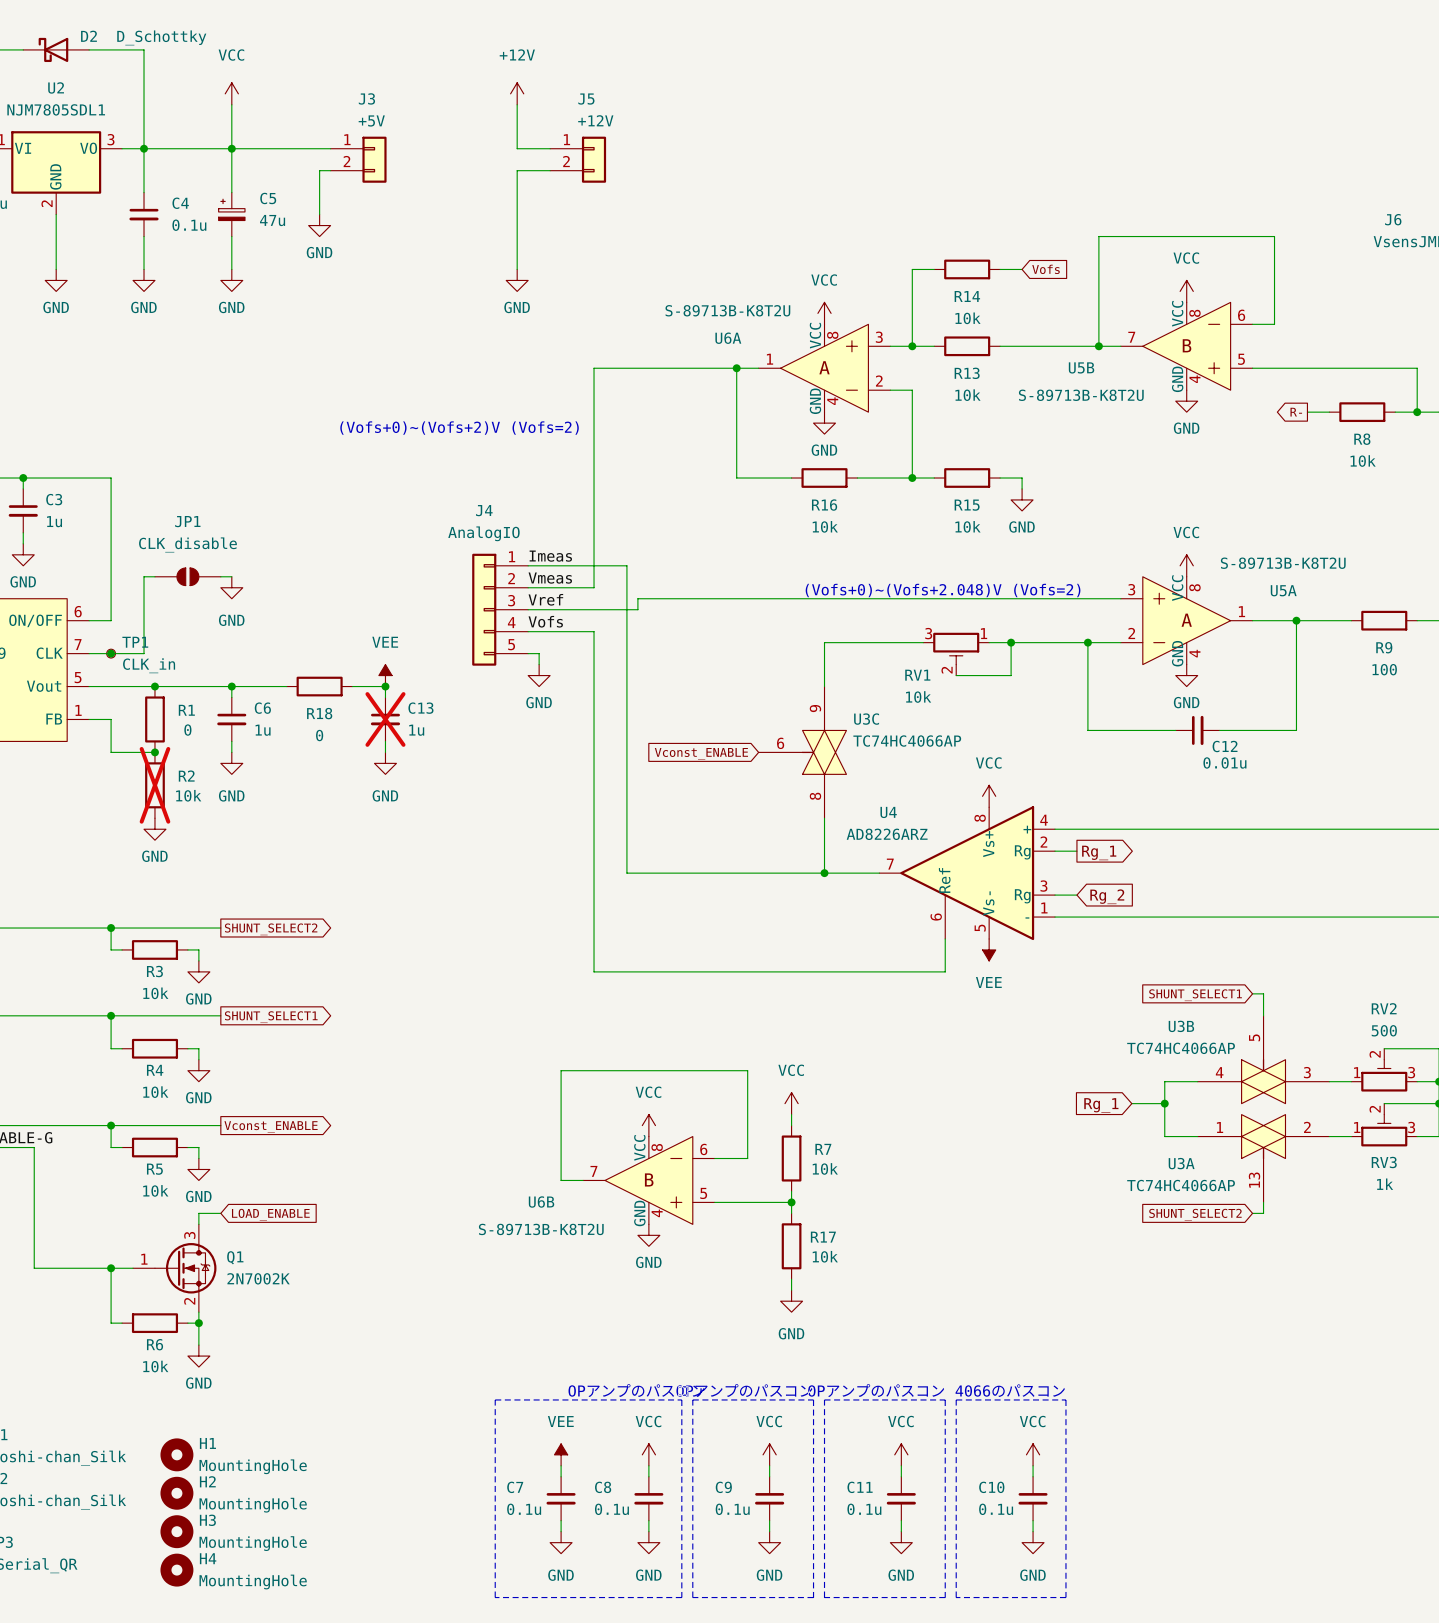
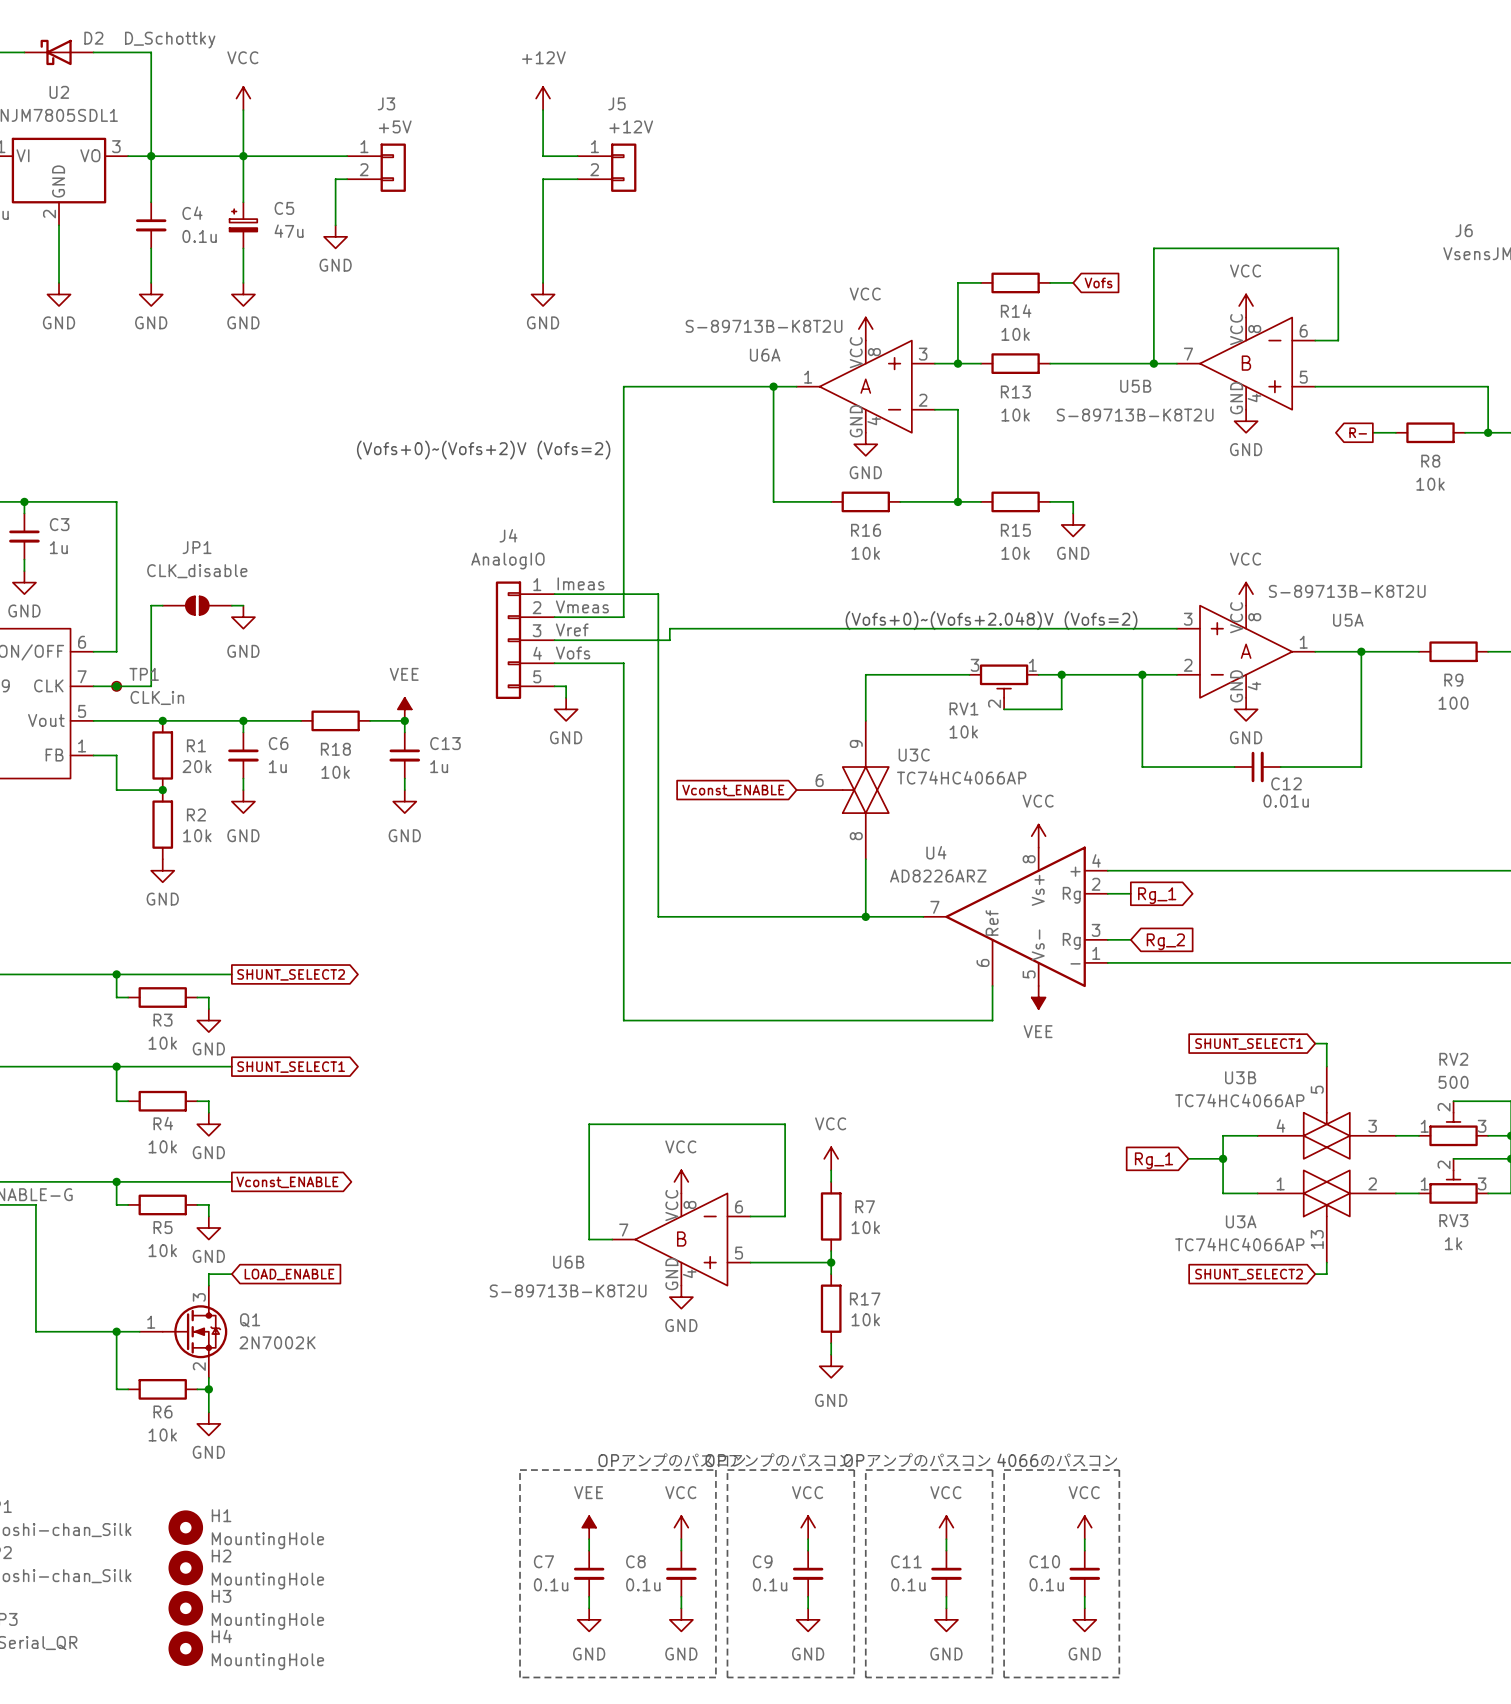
C13 do-not-place cross: (385, 719) -> none
R1 value: 0 (187, 730) -> 20k (197, 766)
R18 value: 0 (319, 735) -> 10k (335, 772)
R2 do-not-place cross: (154, 785) -> none

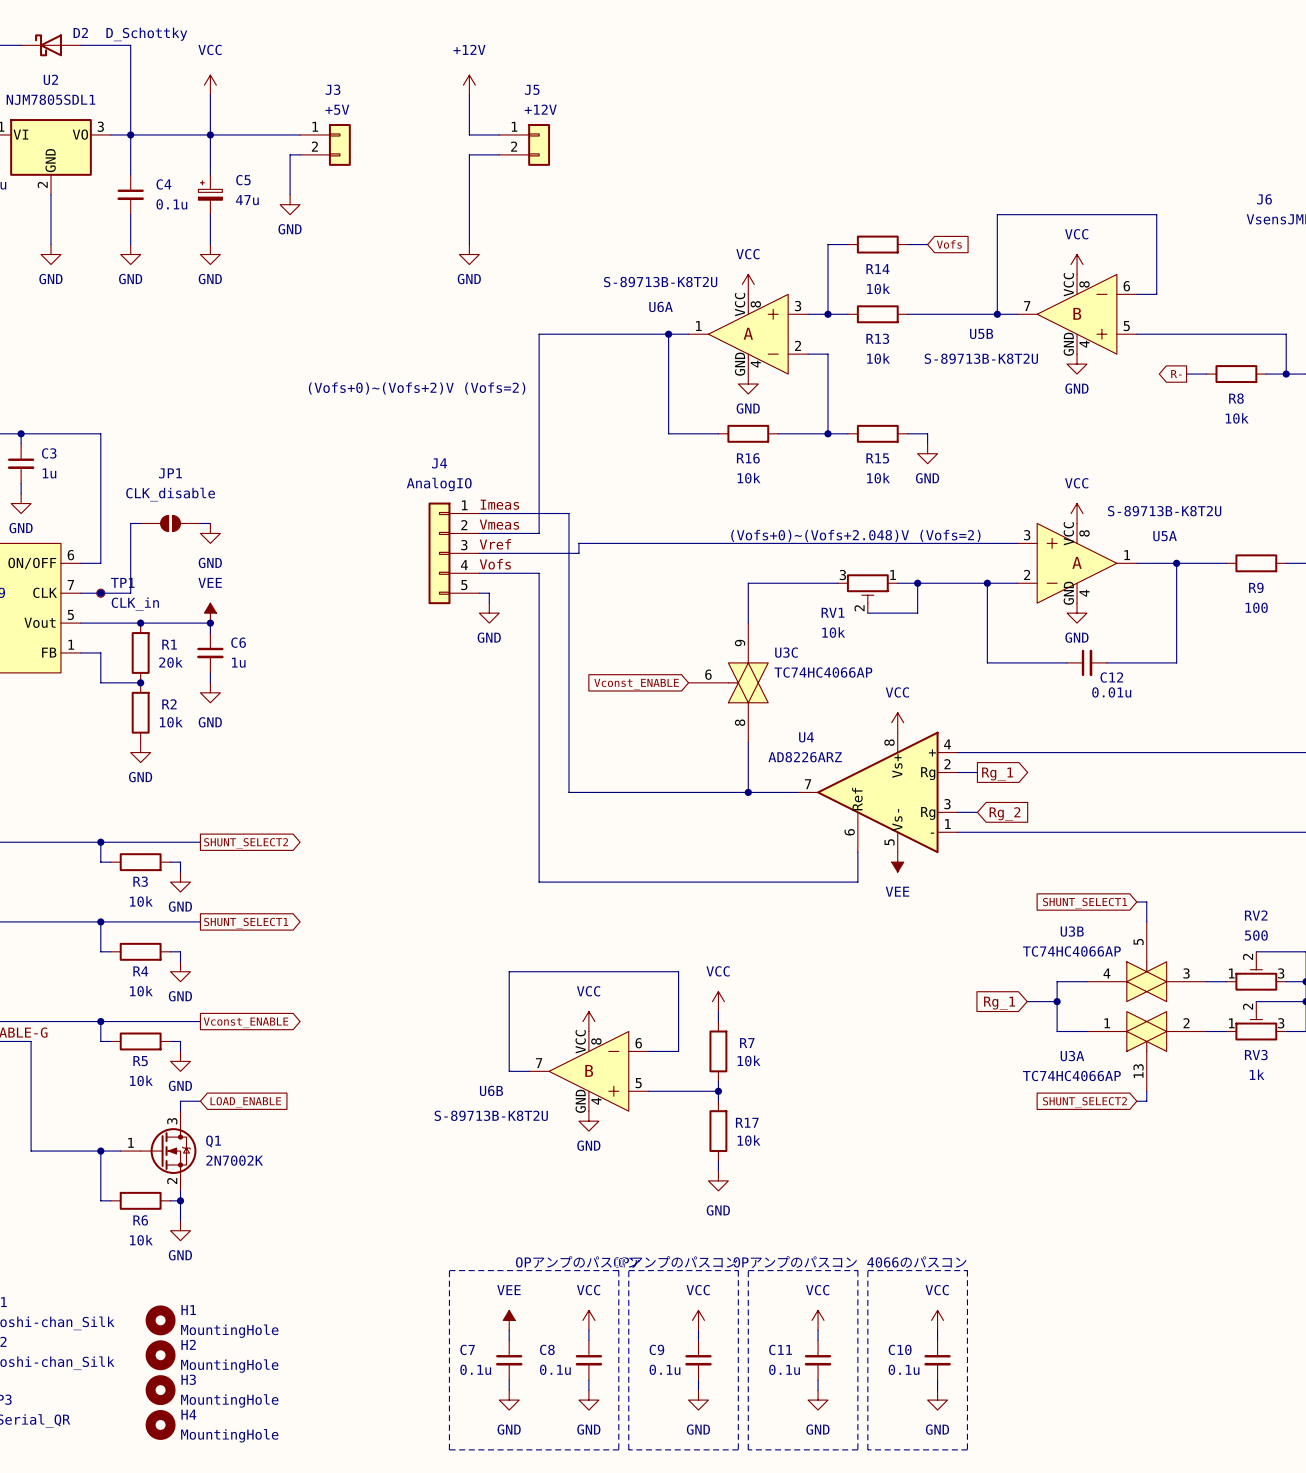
power symbol position: VEE (404, 709) -> VEE (210, 613)
wire: (243, 720) (301, 720) -> none
R18: 10k (335, 720) -> none
wire: (370, 720) (404, 720) (404, 732) -> none
junction: (404, 720) -> none
C13: 1u (404, 755) -> none
wire: (404, 778) (404, 790) -> none
power symbol: GND (404, 801) -> none

